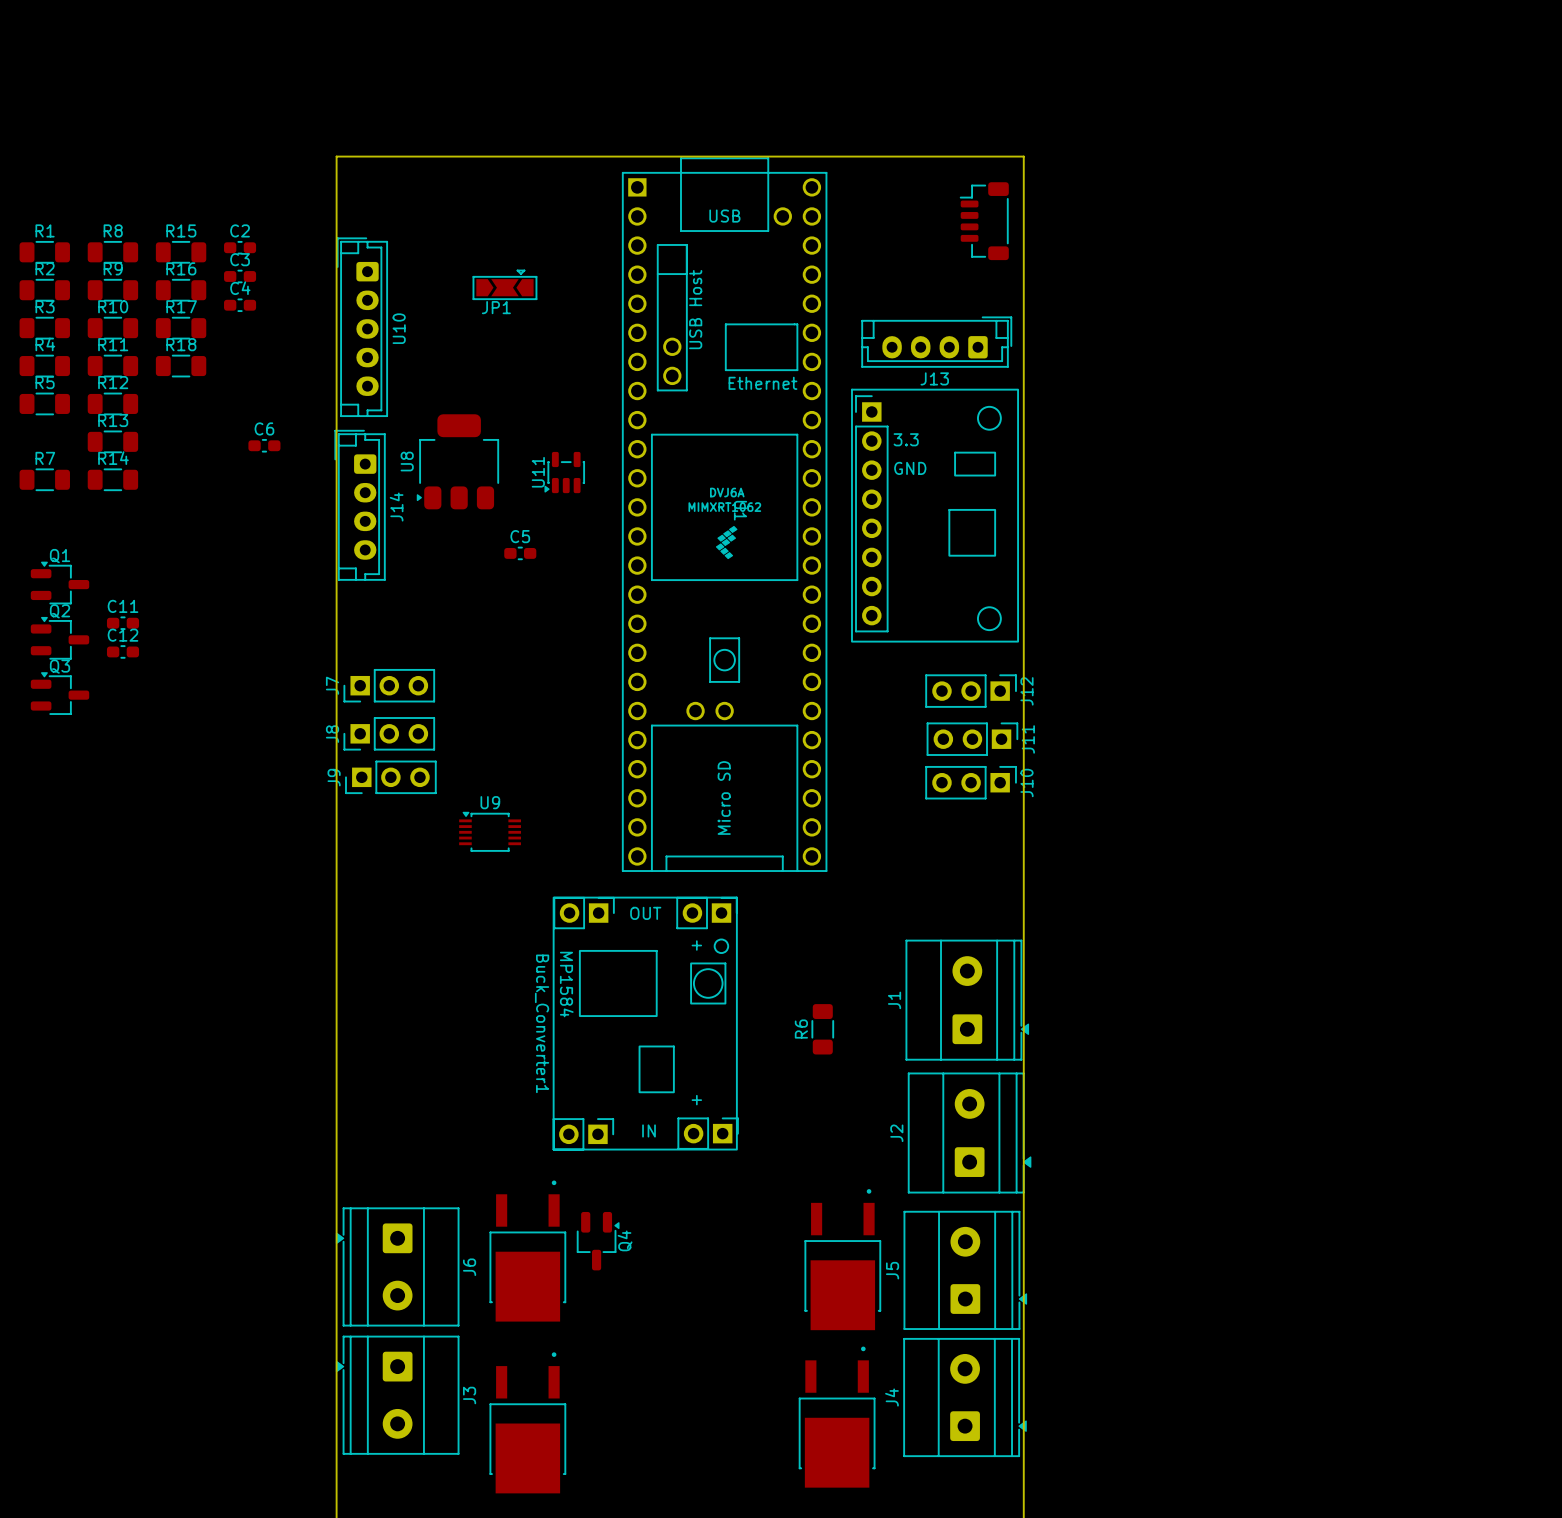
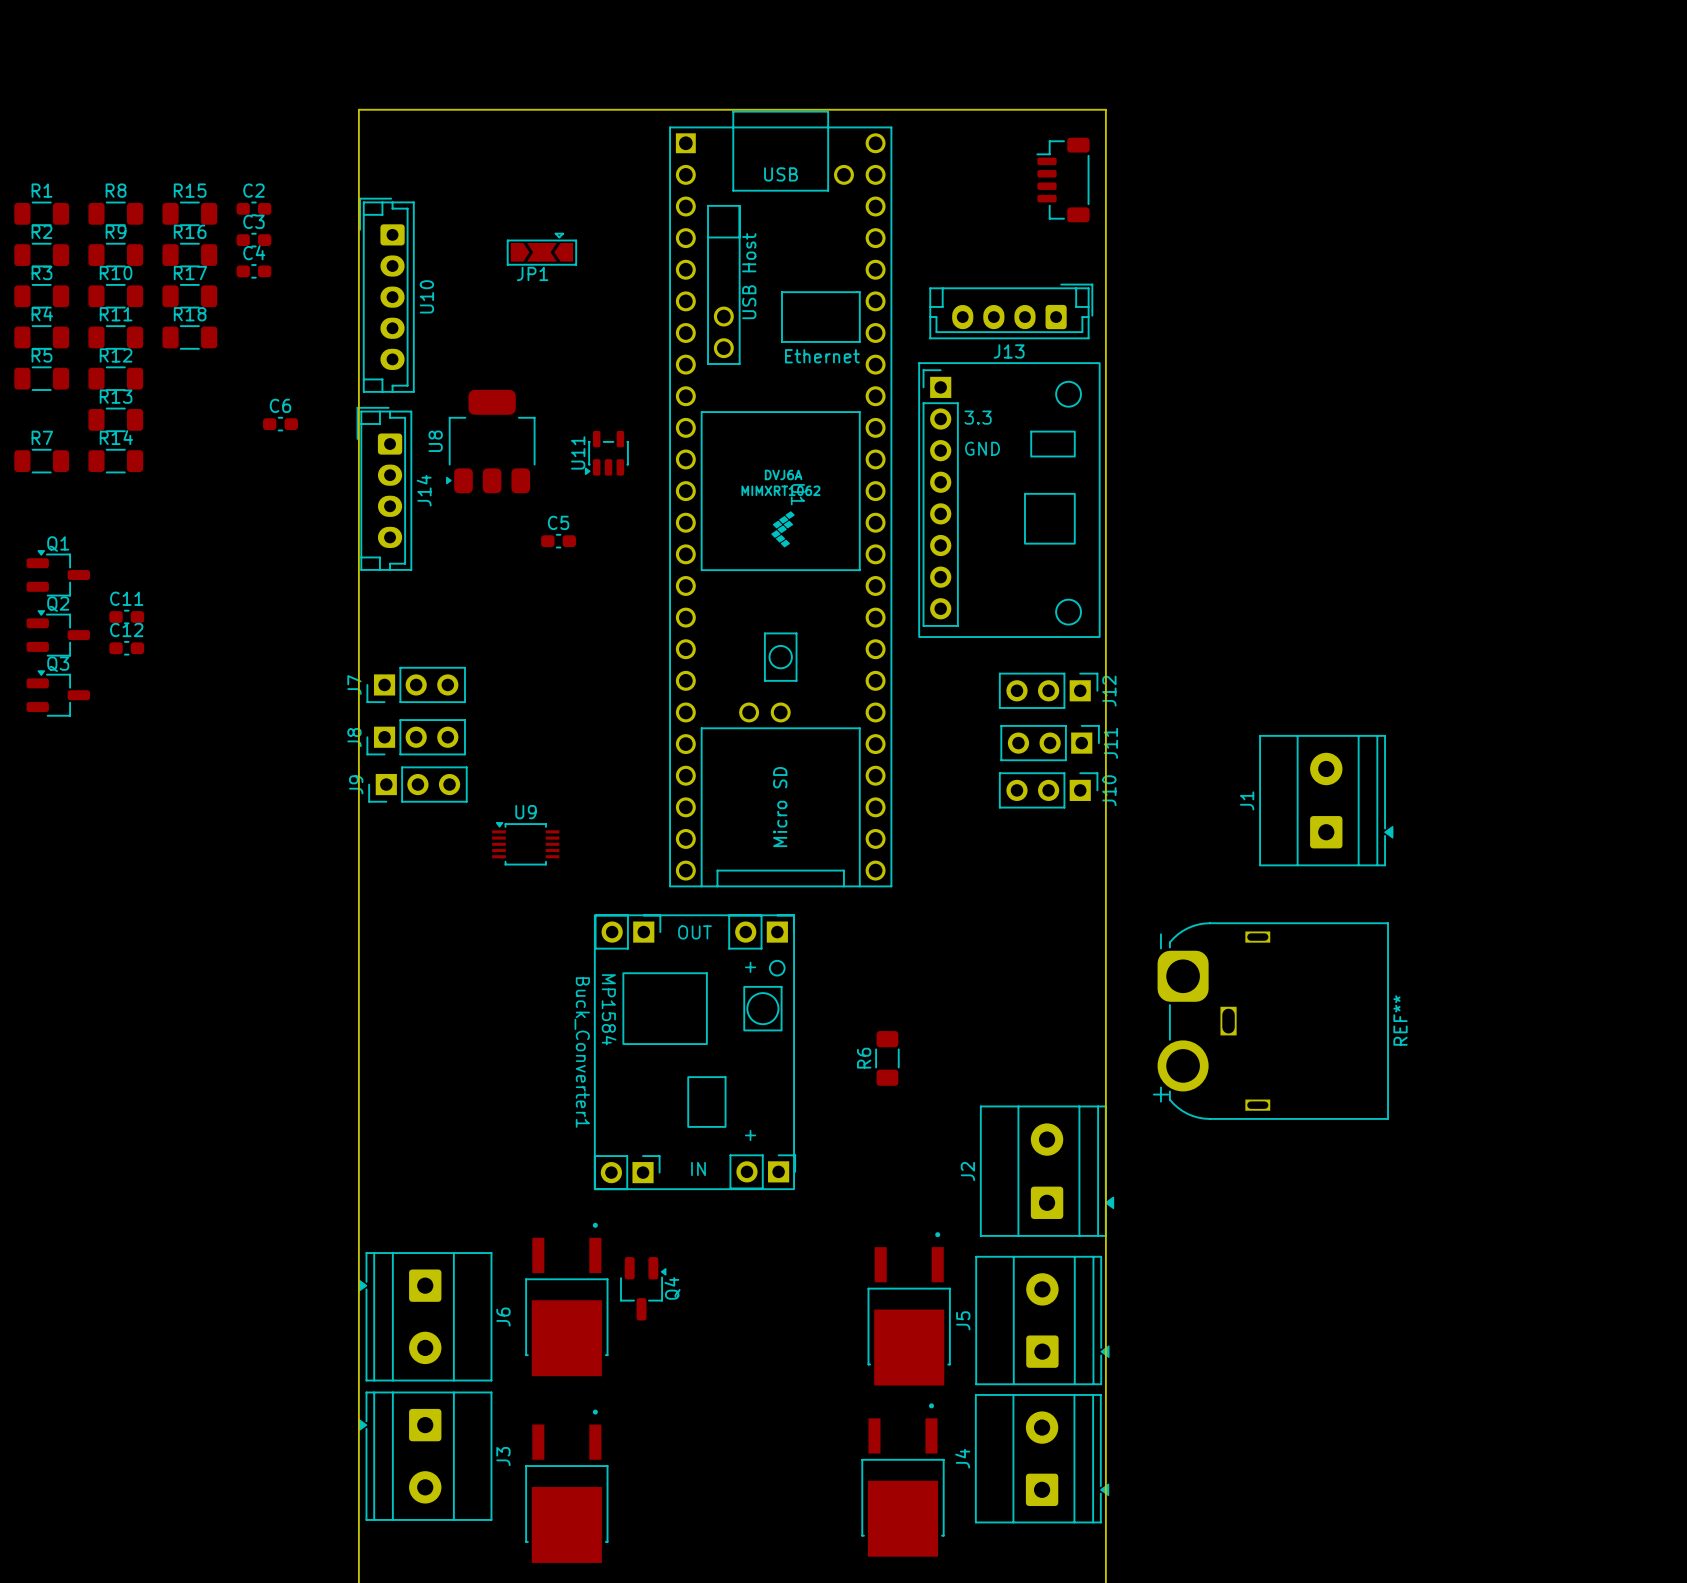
REF**: none -> (1273, 1021)
J1 position: (967, 1000) -> (1326, 800)

